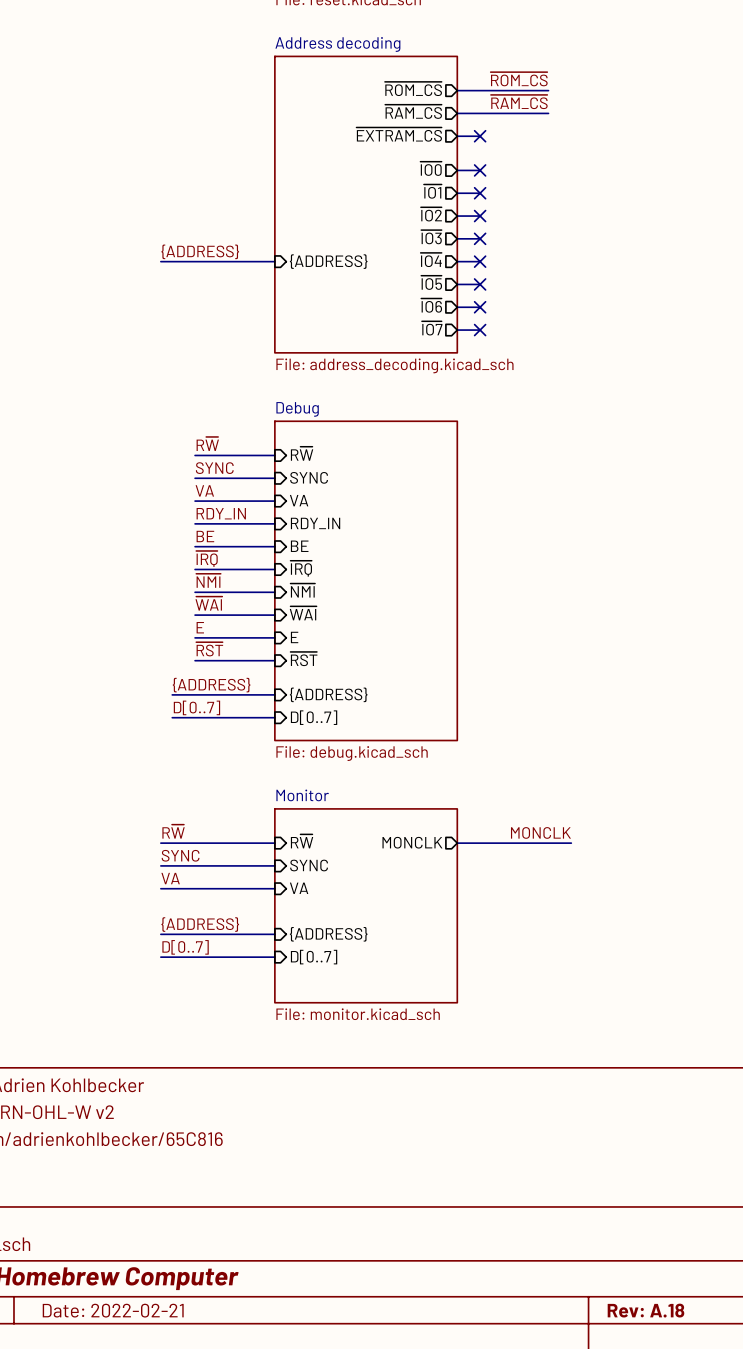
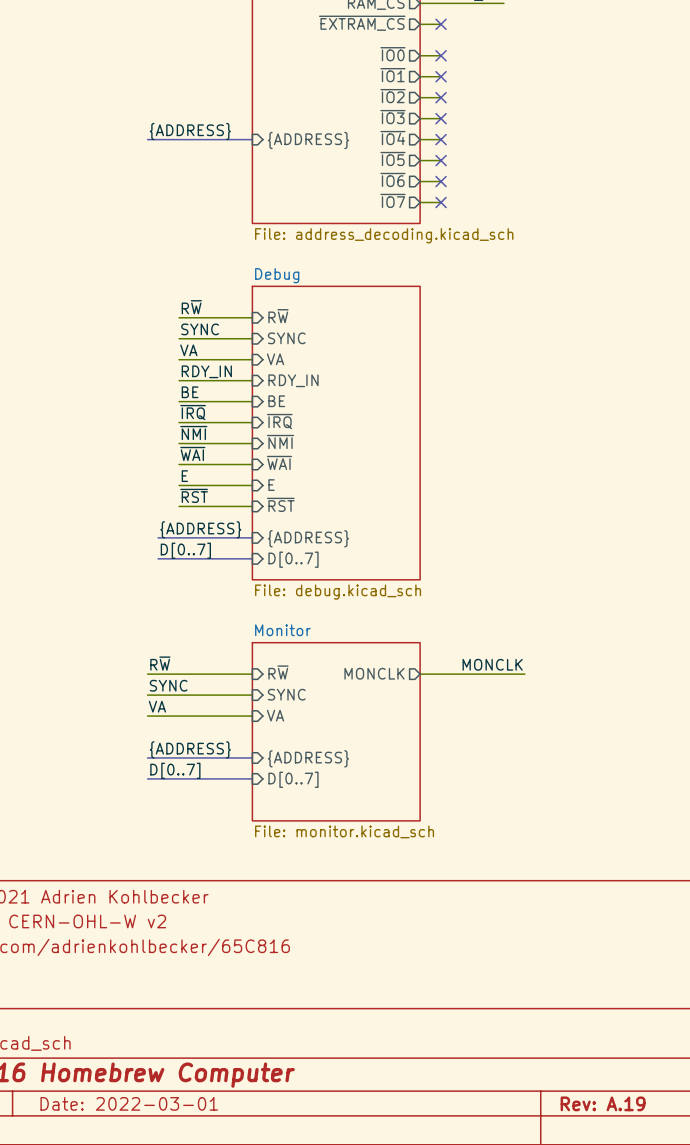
title block: Date: 2022-02-21 (113, 1310) -> Date: 2022-03-01 (129, 1103)
title block: Rev: A.18 (645, 1310) -> Rev: A.19 (603, 1103)

